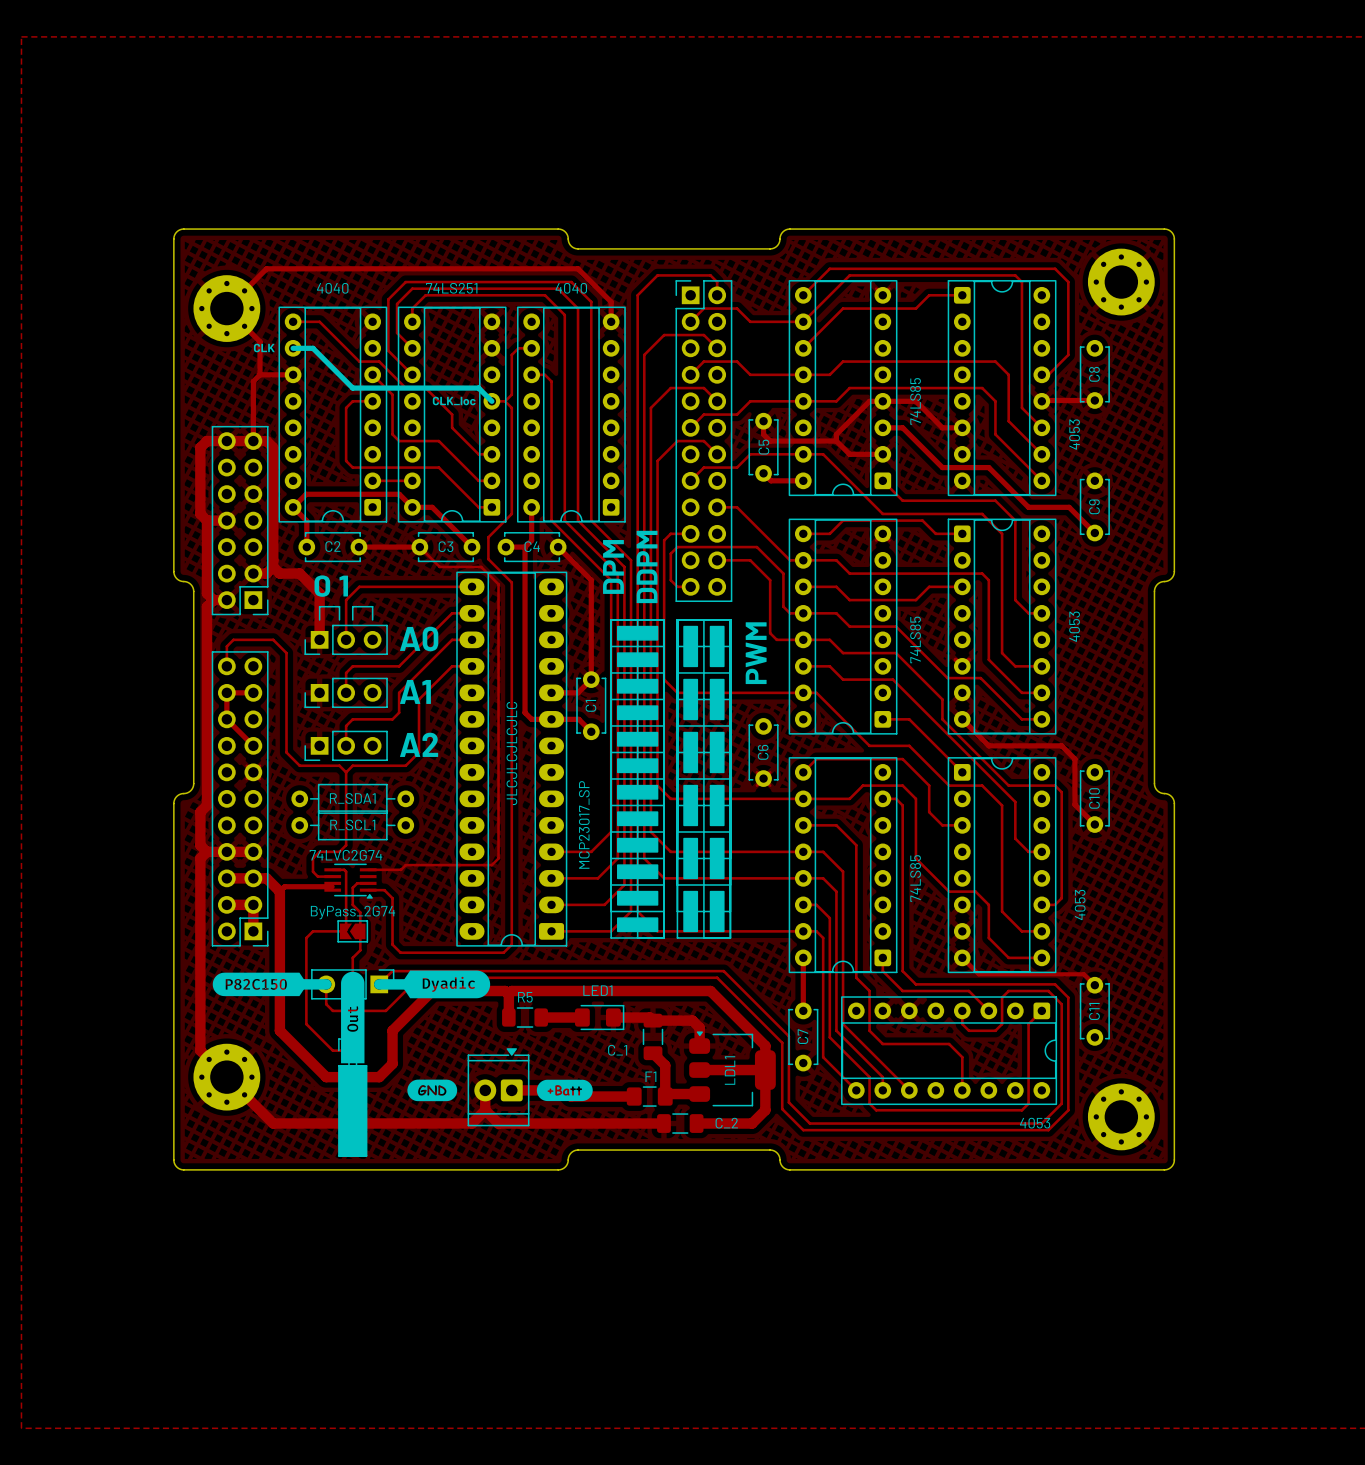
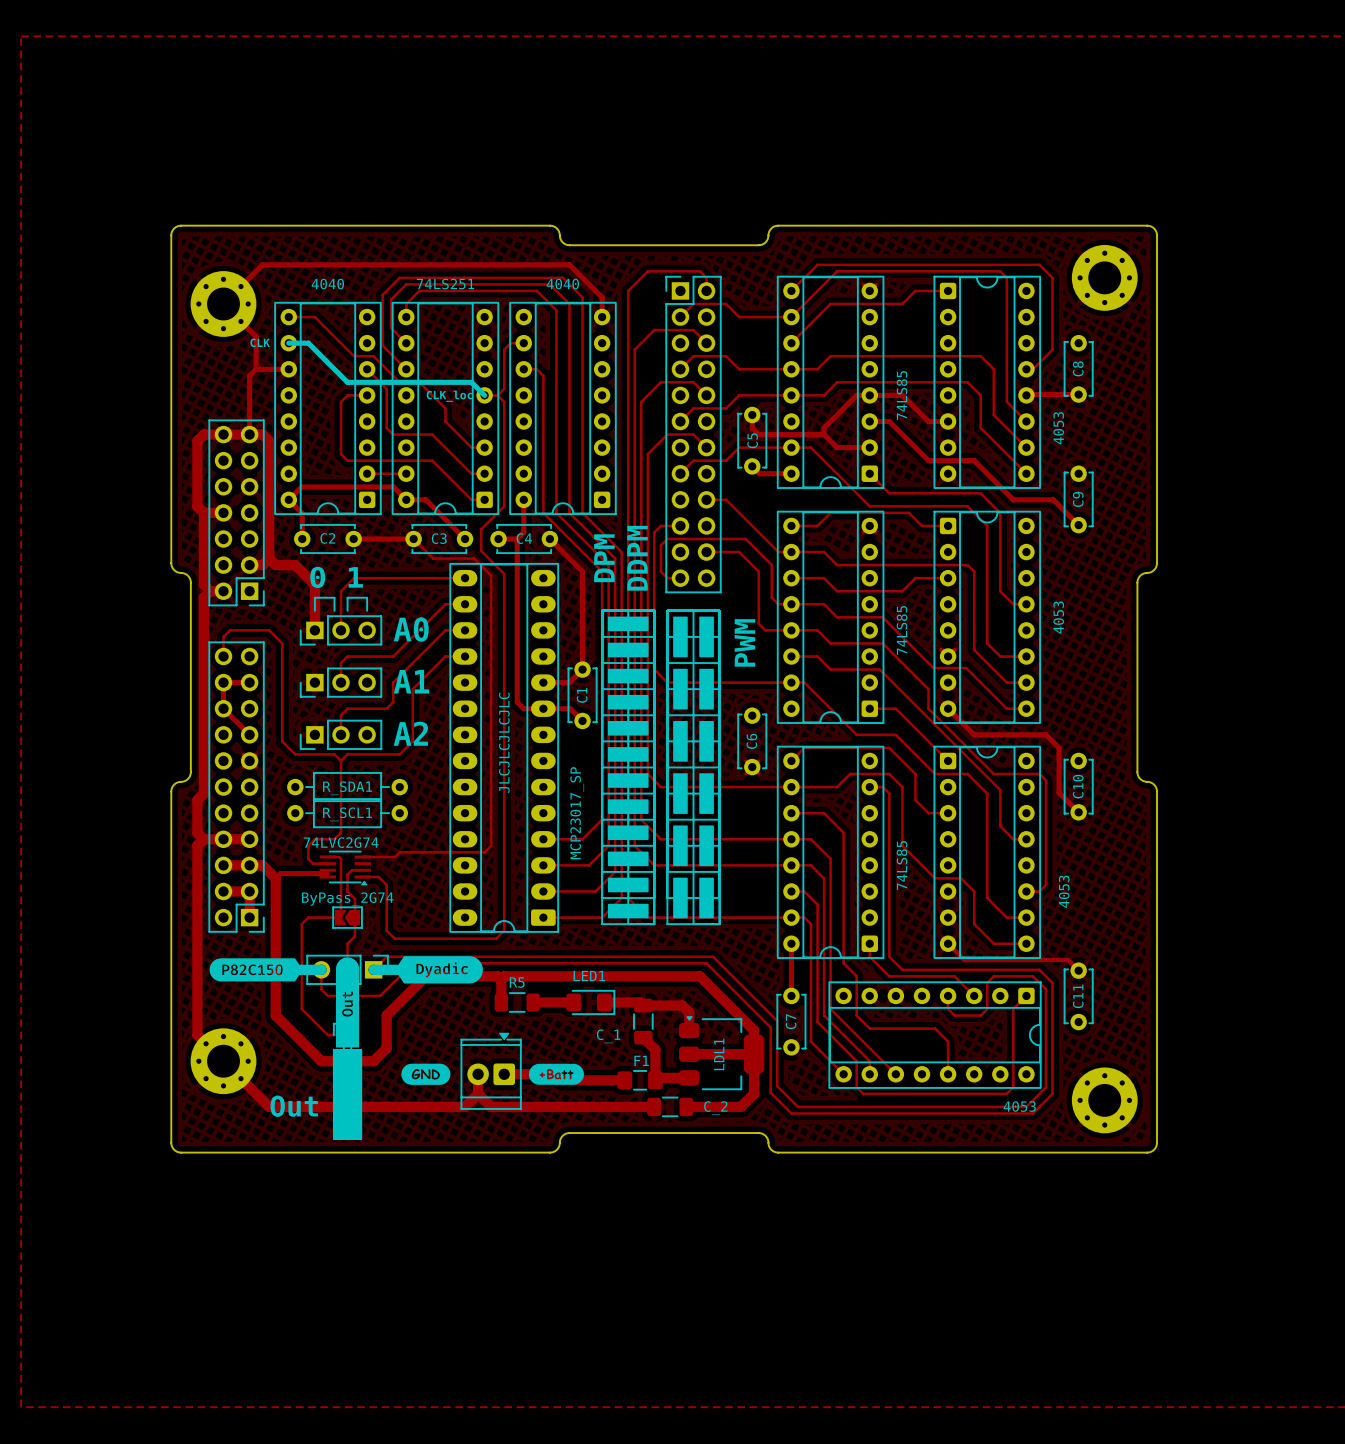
text: none -> Out (294, 1106)

